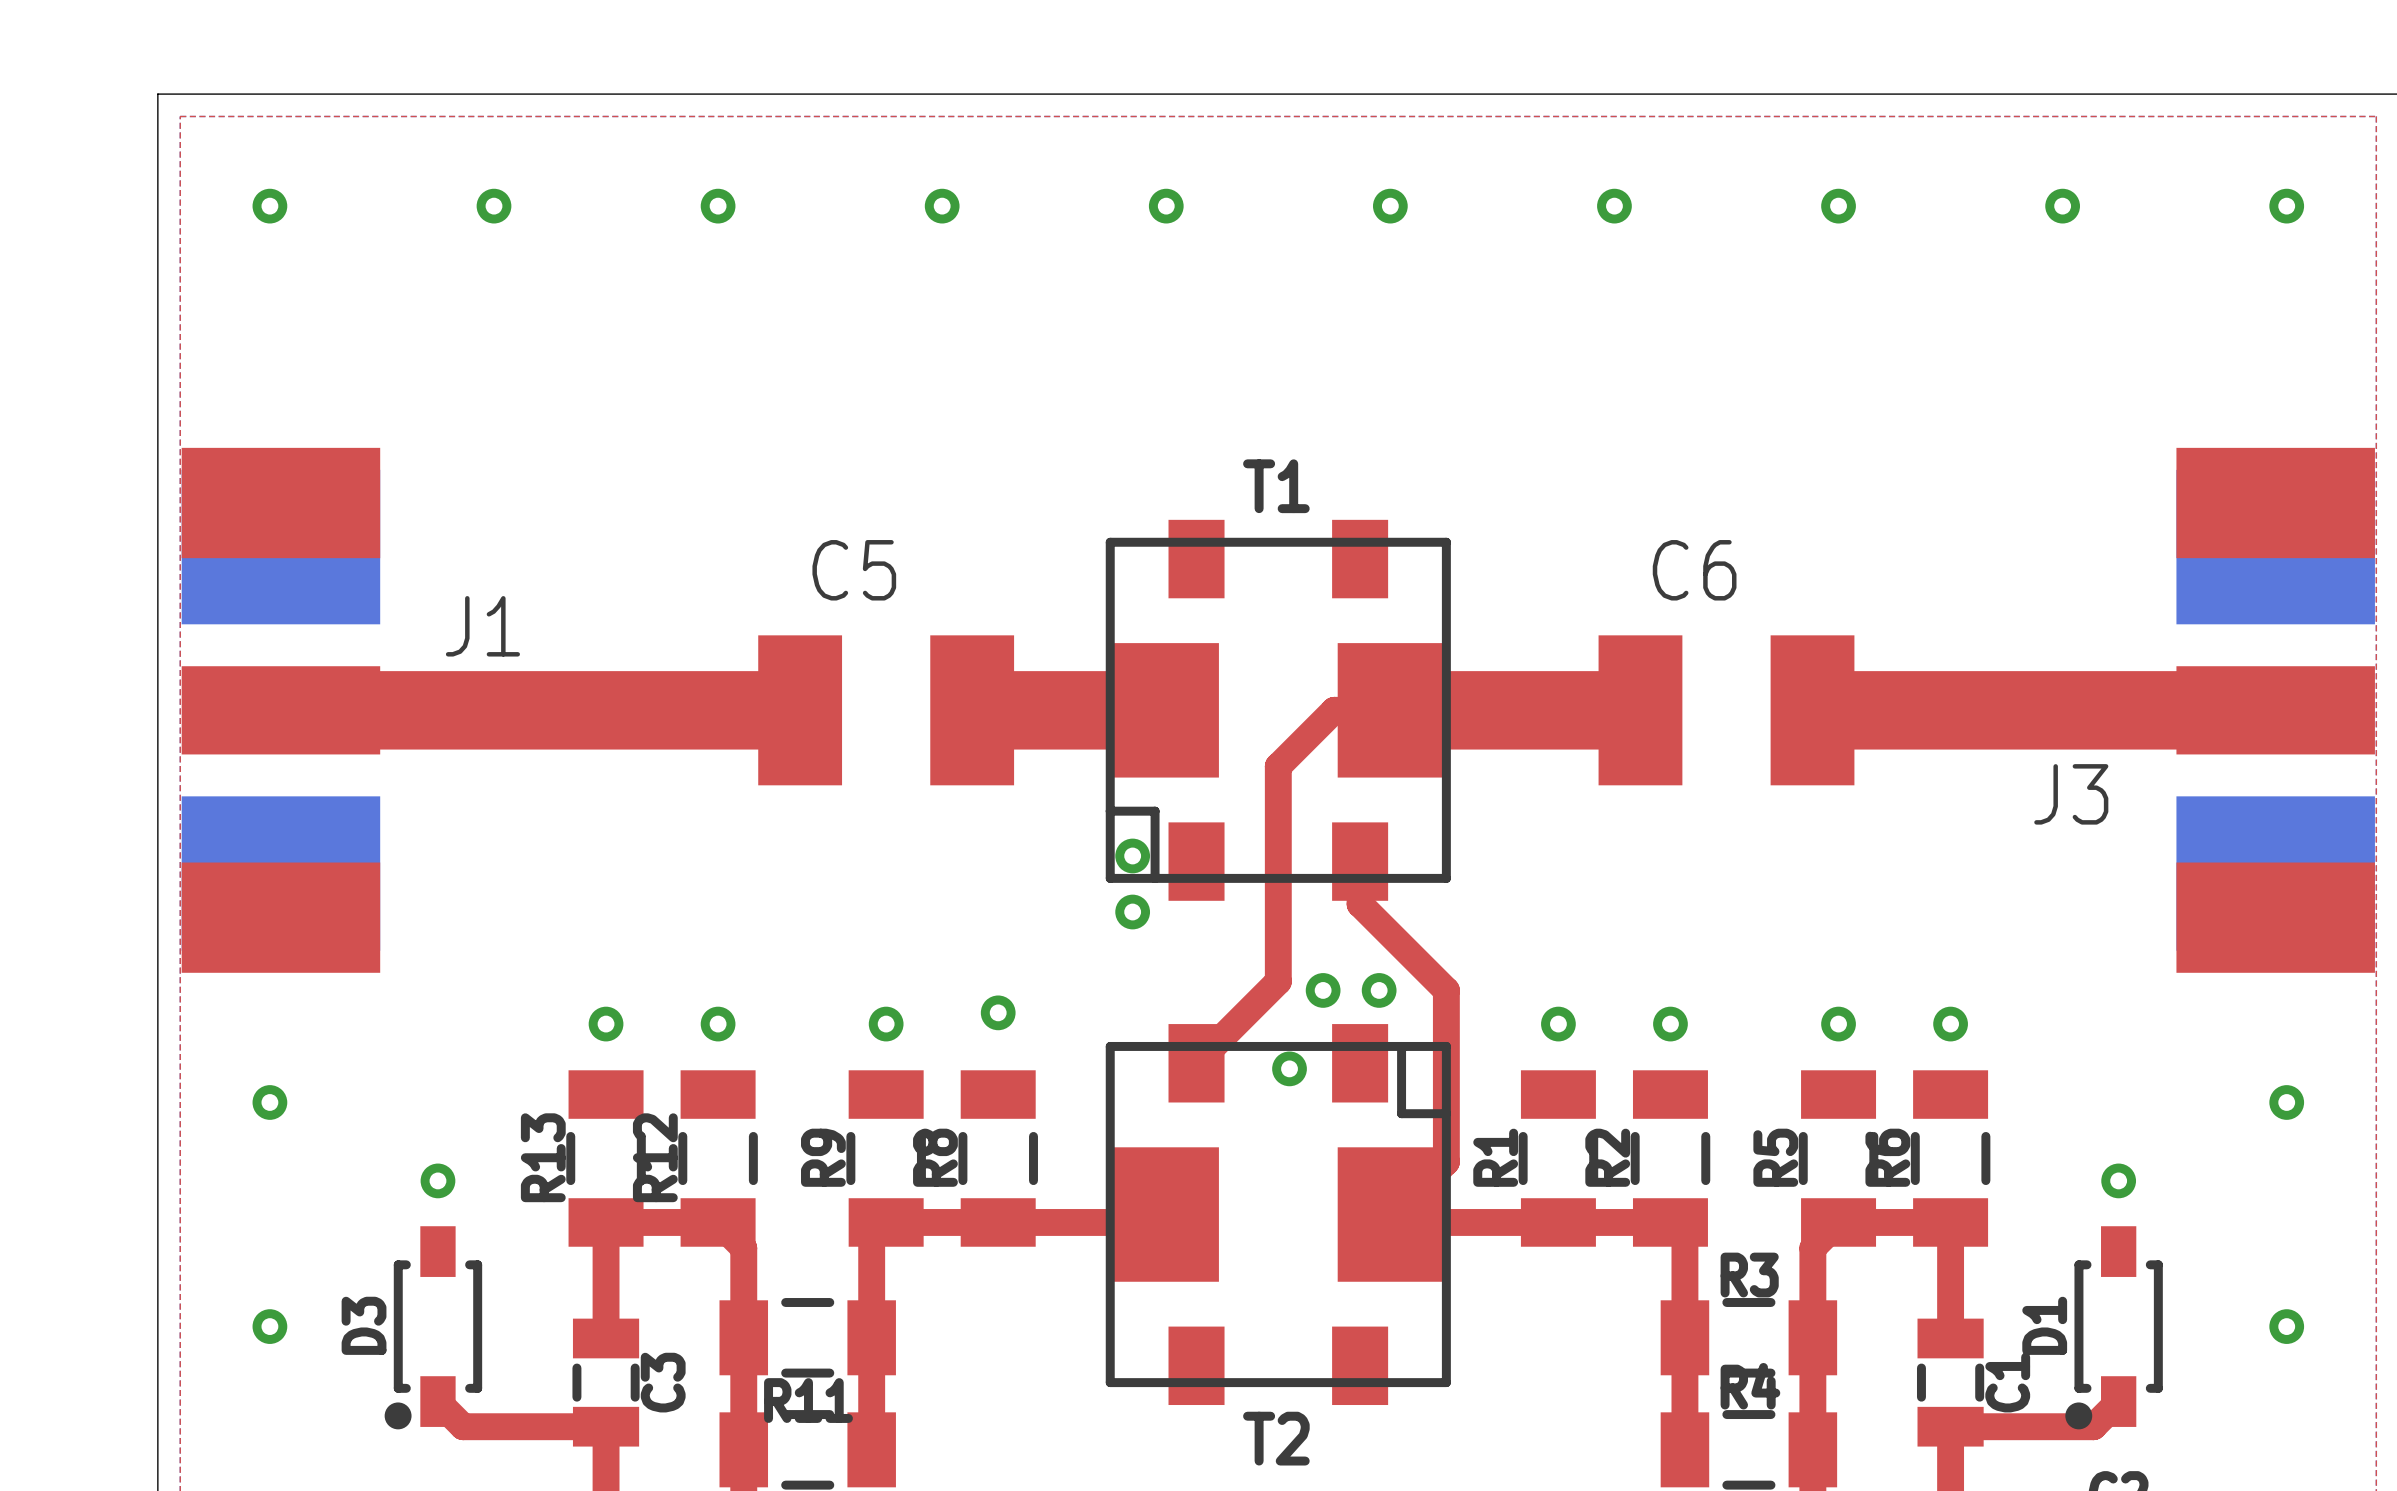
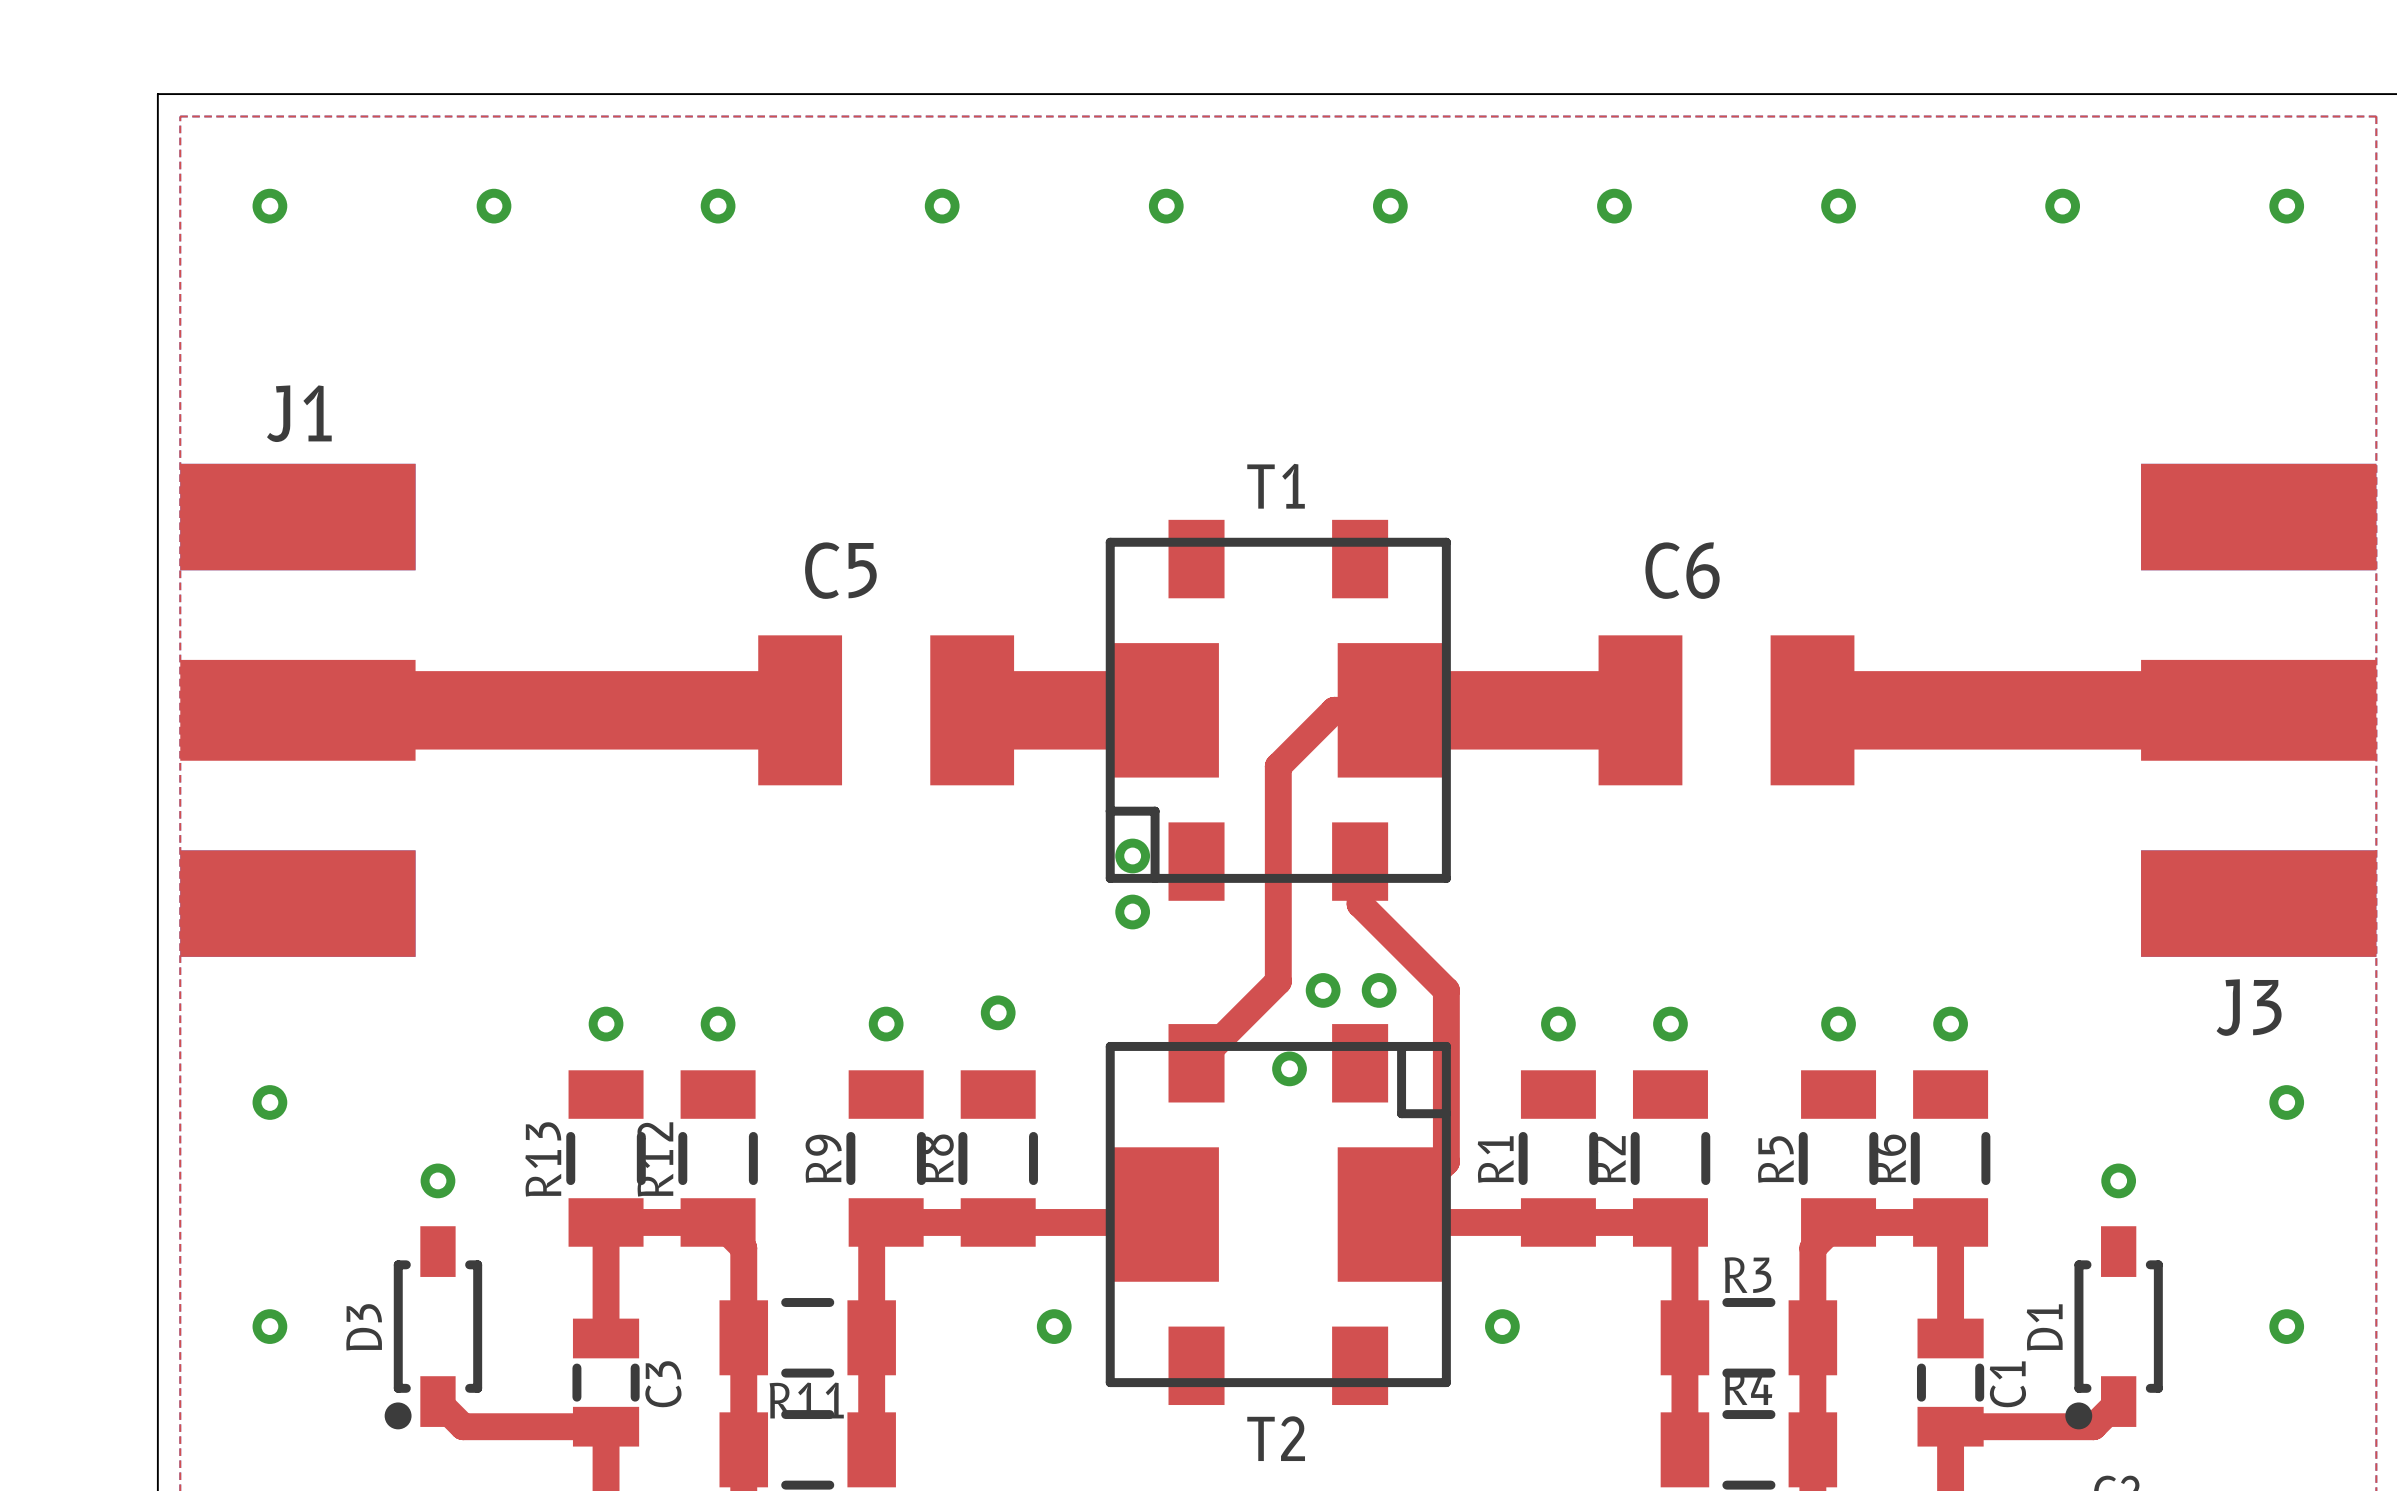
J1 footprint: [181, 447, 381, 973] -> [180, 463, 416, 957]
J3 footprint: [2176, 447, 2375, 973] -> [2141, 463, 2377, 957]
J1 name position: J1 (482, 626) -> J1 (299, 413)
J3 name position: J3 (2071, 794) -> J3 (2249, 1007)
via: none -> (1054, 1326)
via: none -> (1502, 1326)

